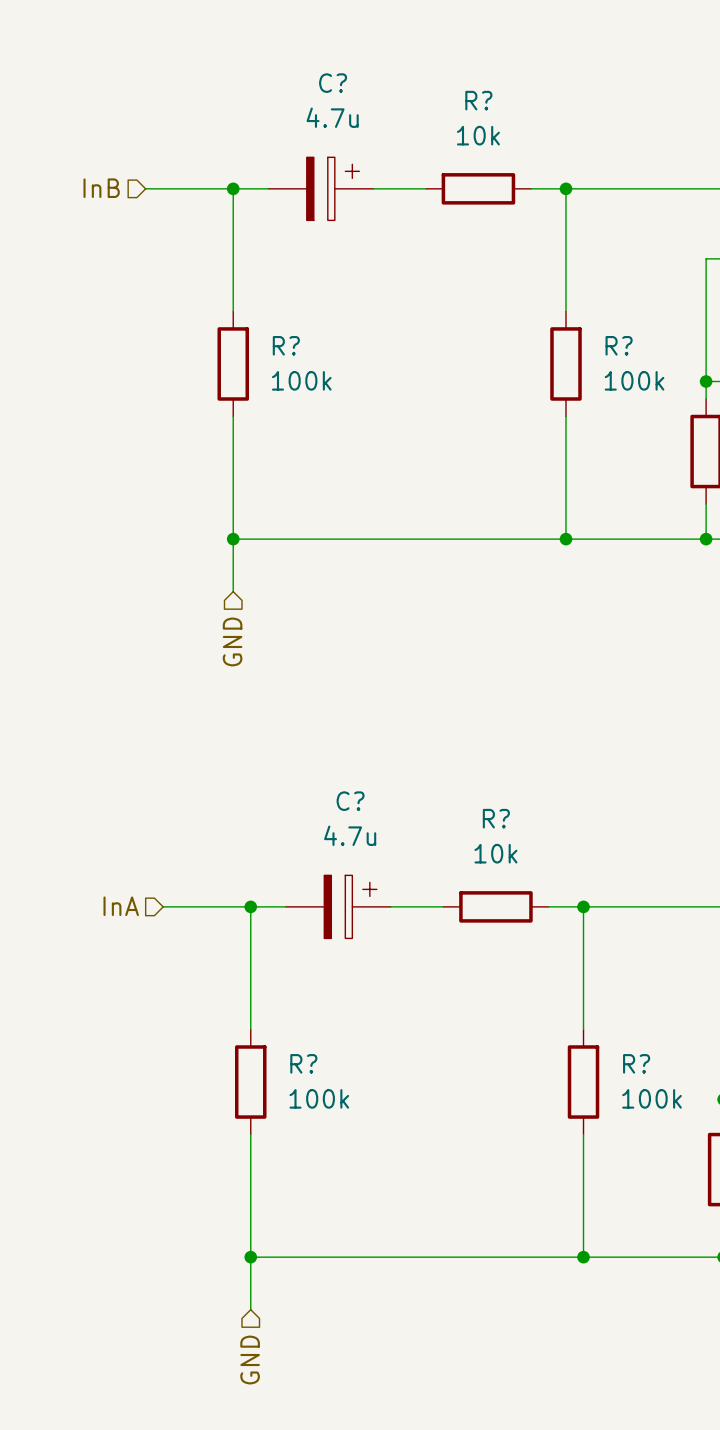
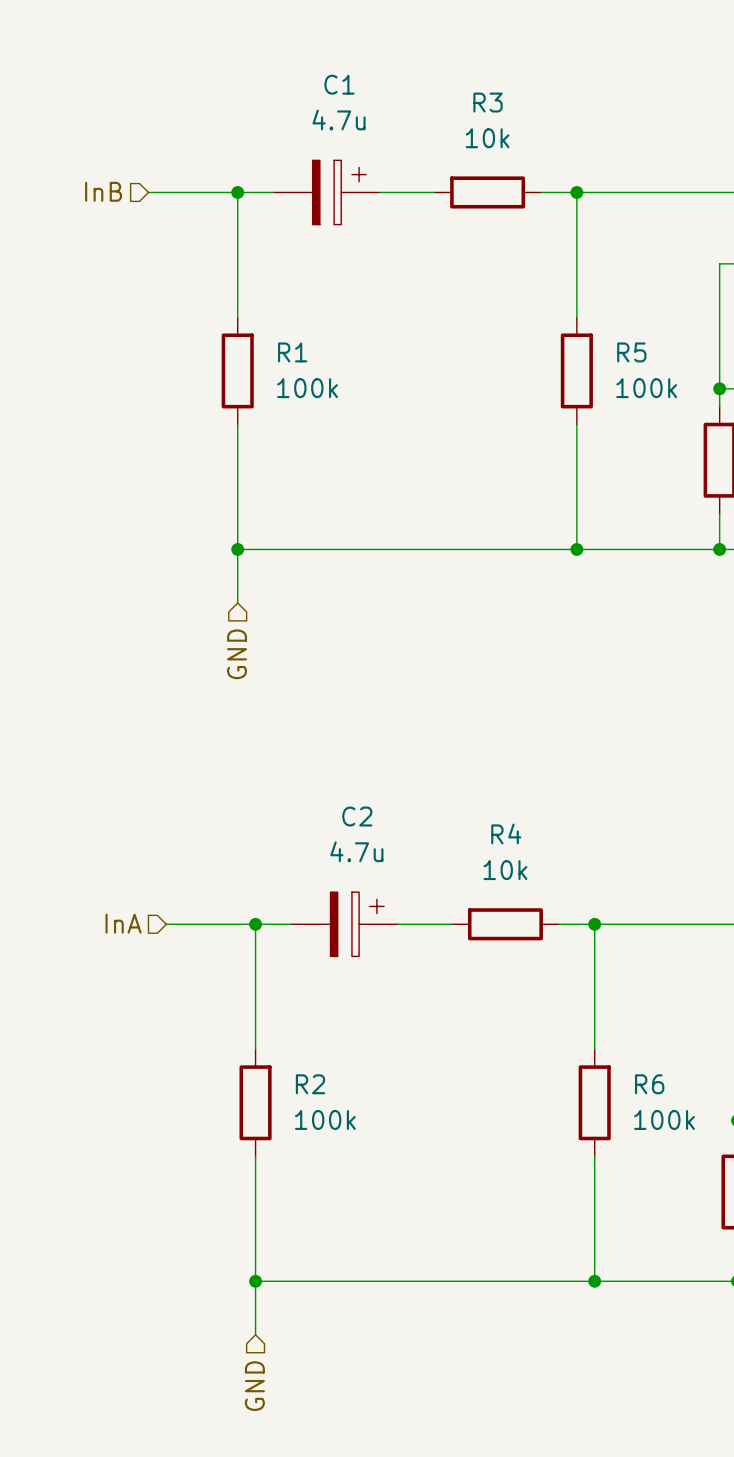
C? name: C? (333, 83) -> C1 (339, 84)
R? name: R? (478, 100) -> R3 (488, 102)
R? name: R? (286, 345) -> R1 (292, 352)
R? name: R? (619, 345) -> R5 (631, 352)
C? name: C? (350, 801) -> C2 (357, 816)
R? name: R? (496, 818) -> R4 (506, 833)
R? name: R? (303, 1063) -> R2 (310, 1084)
R? name: R? (636, 1063) -> R6 (649, 1084)

